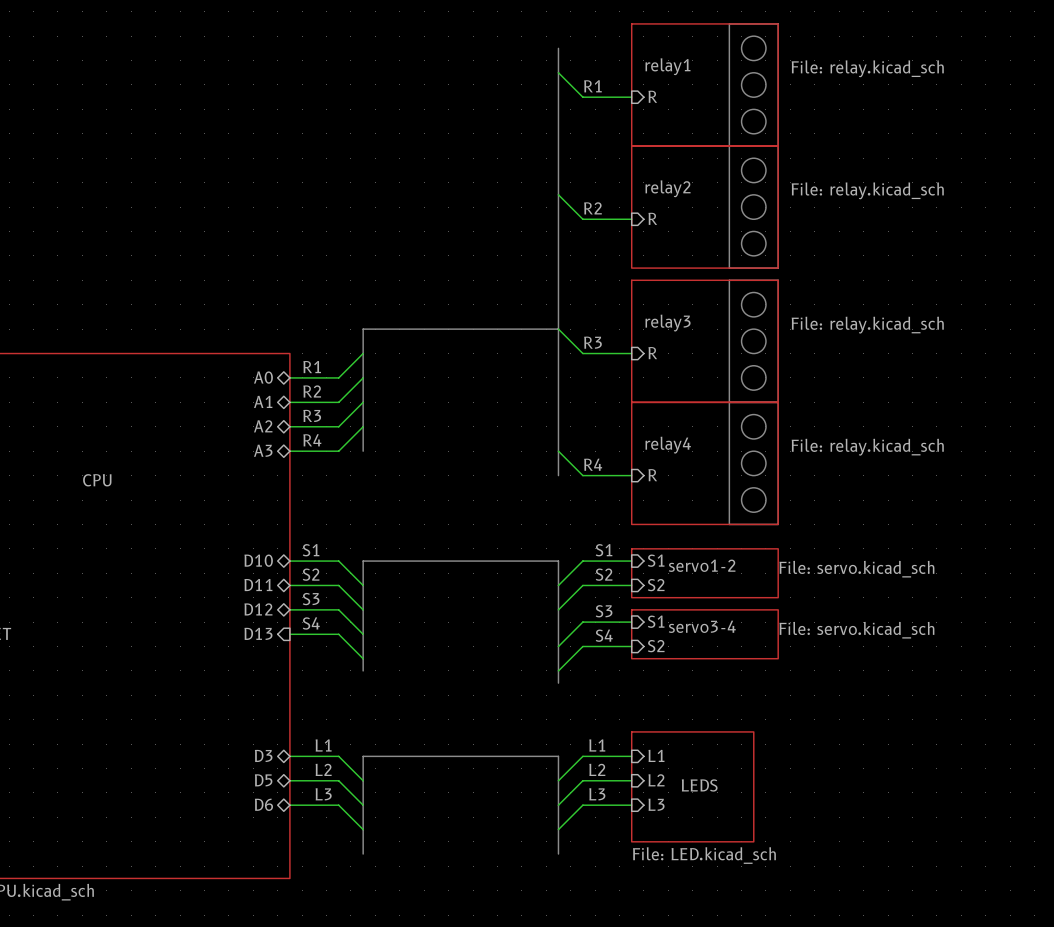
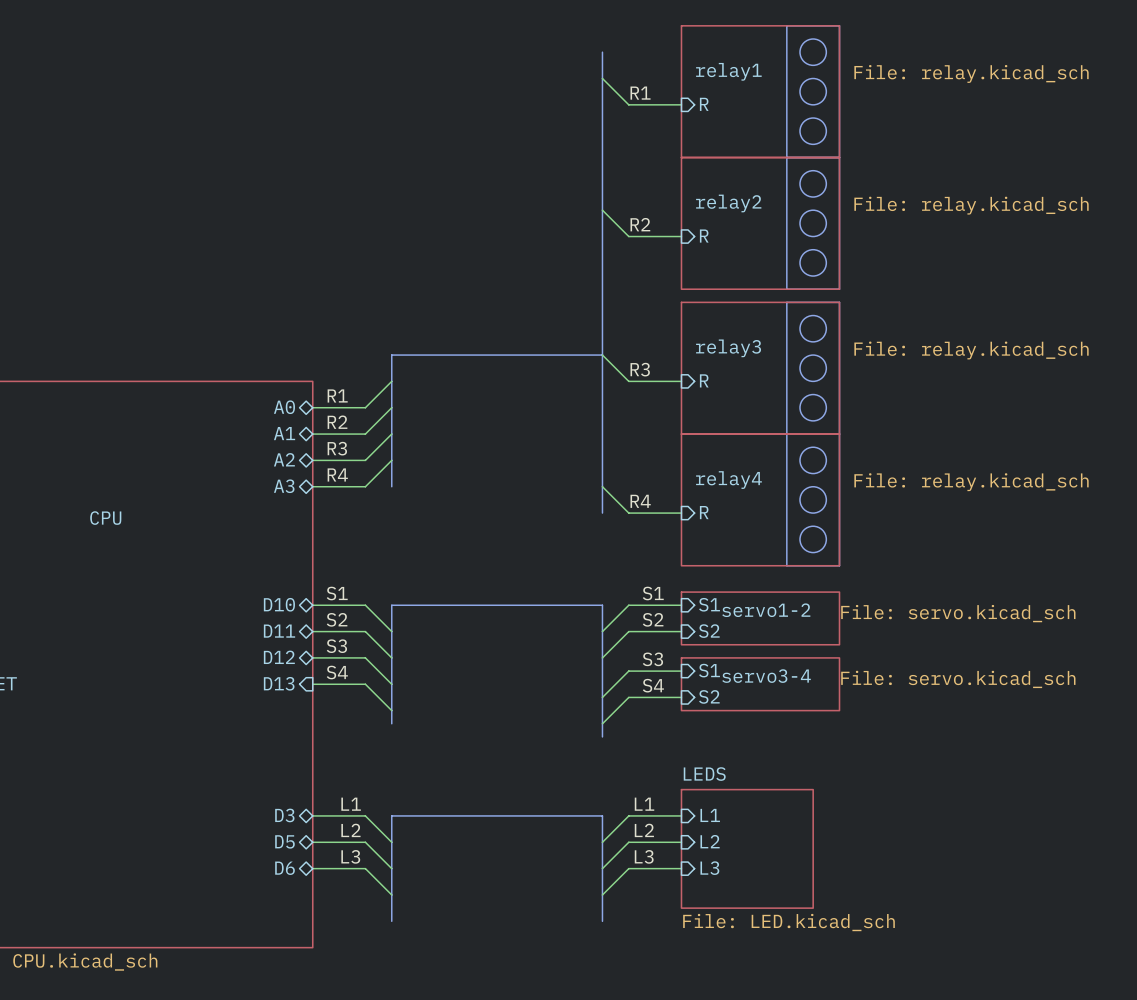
sheet LEDS name position: LEDS (699, 785) -> LEDS (704, 774)

